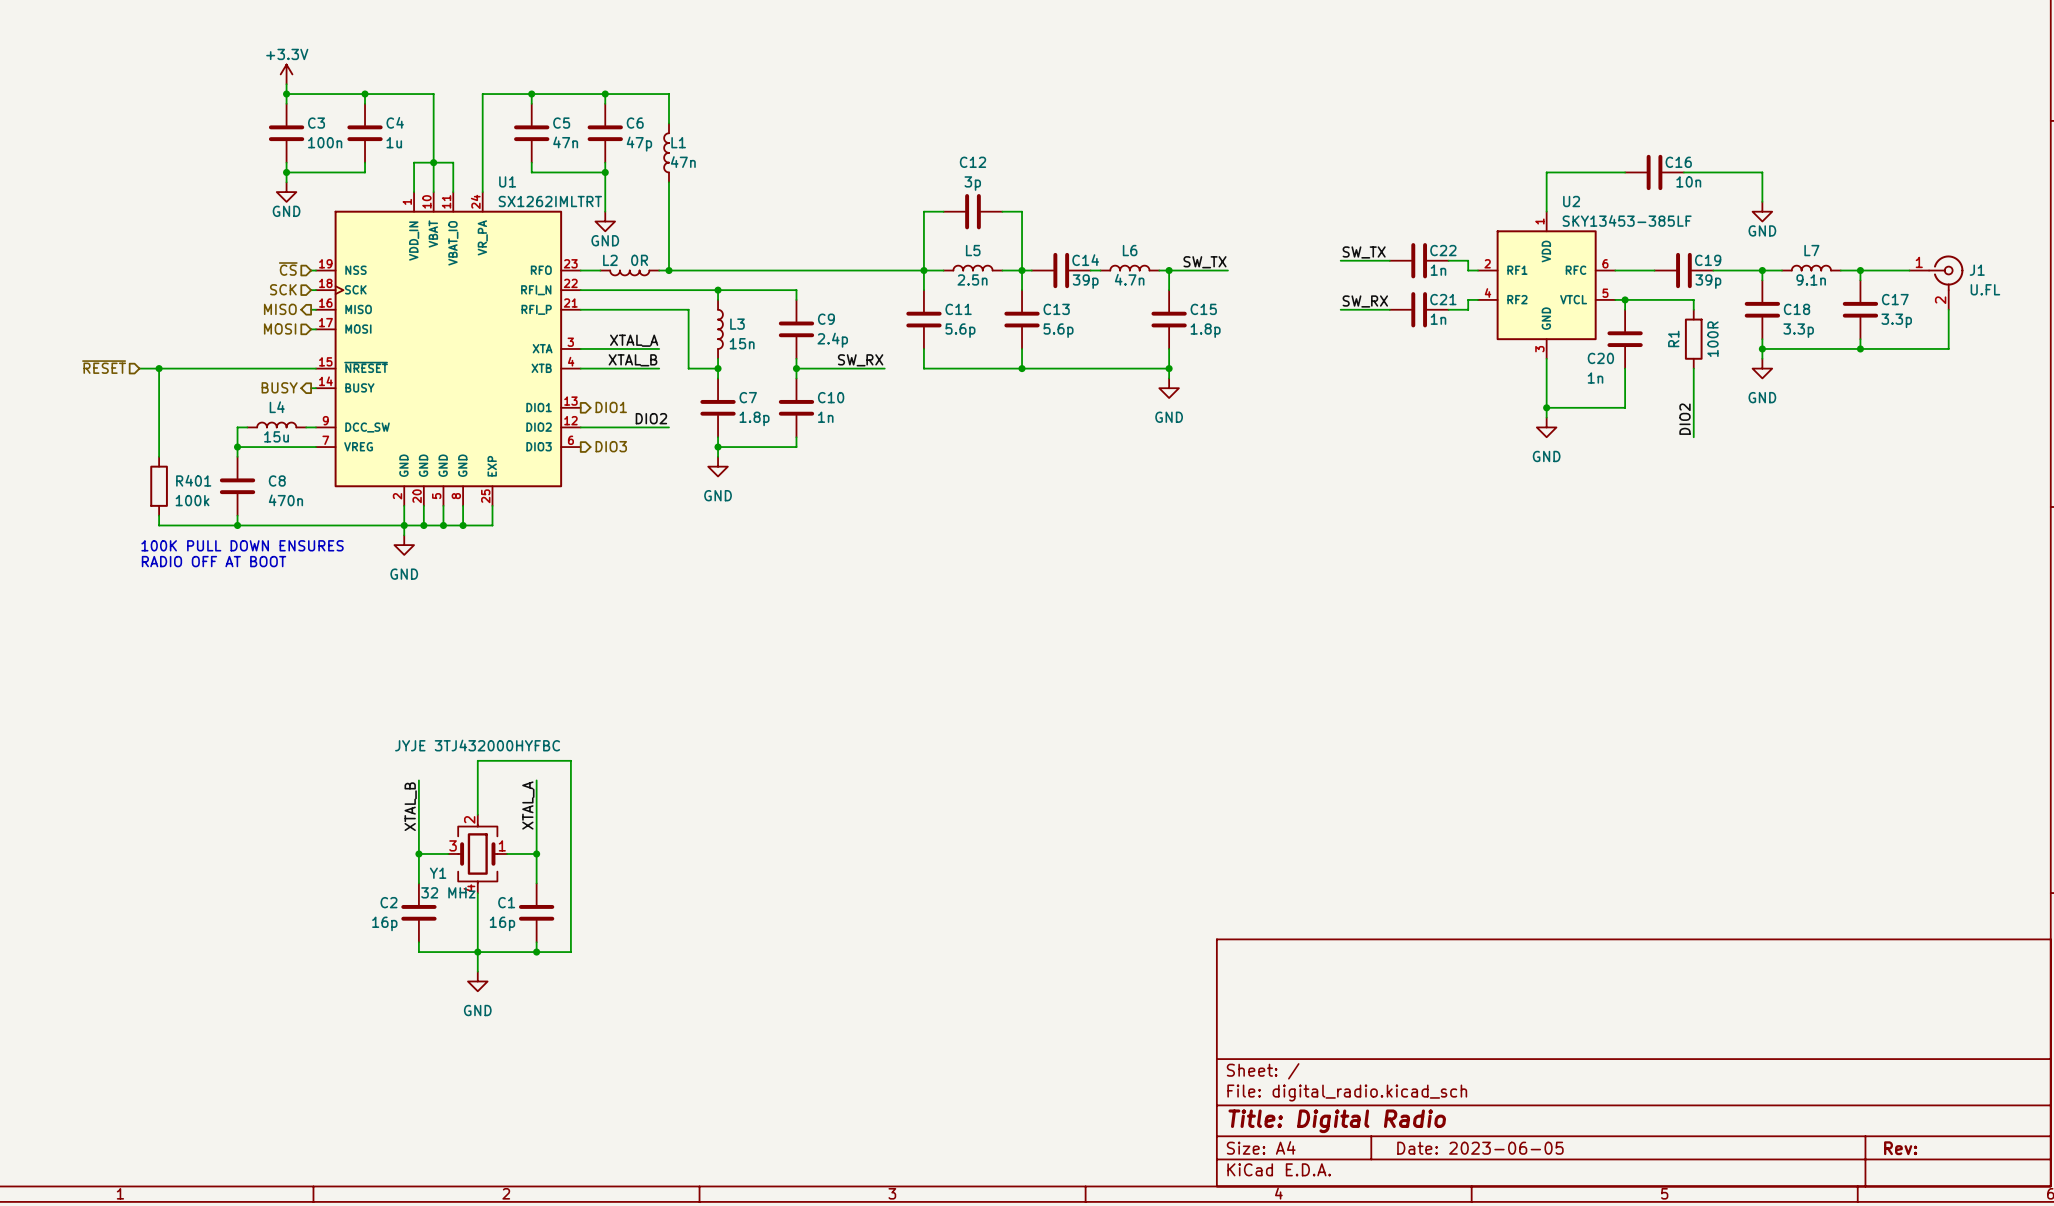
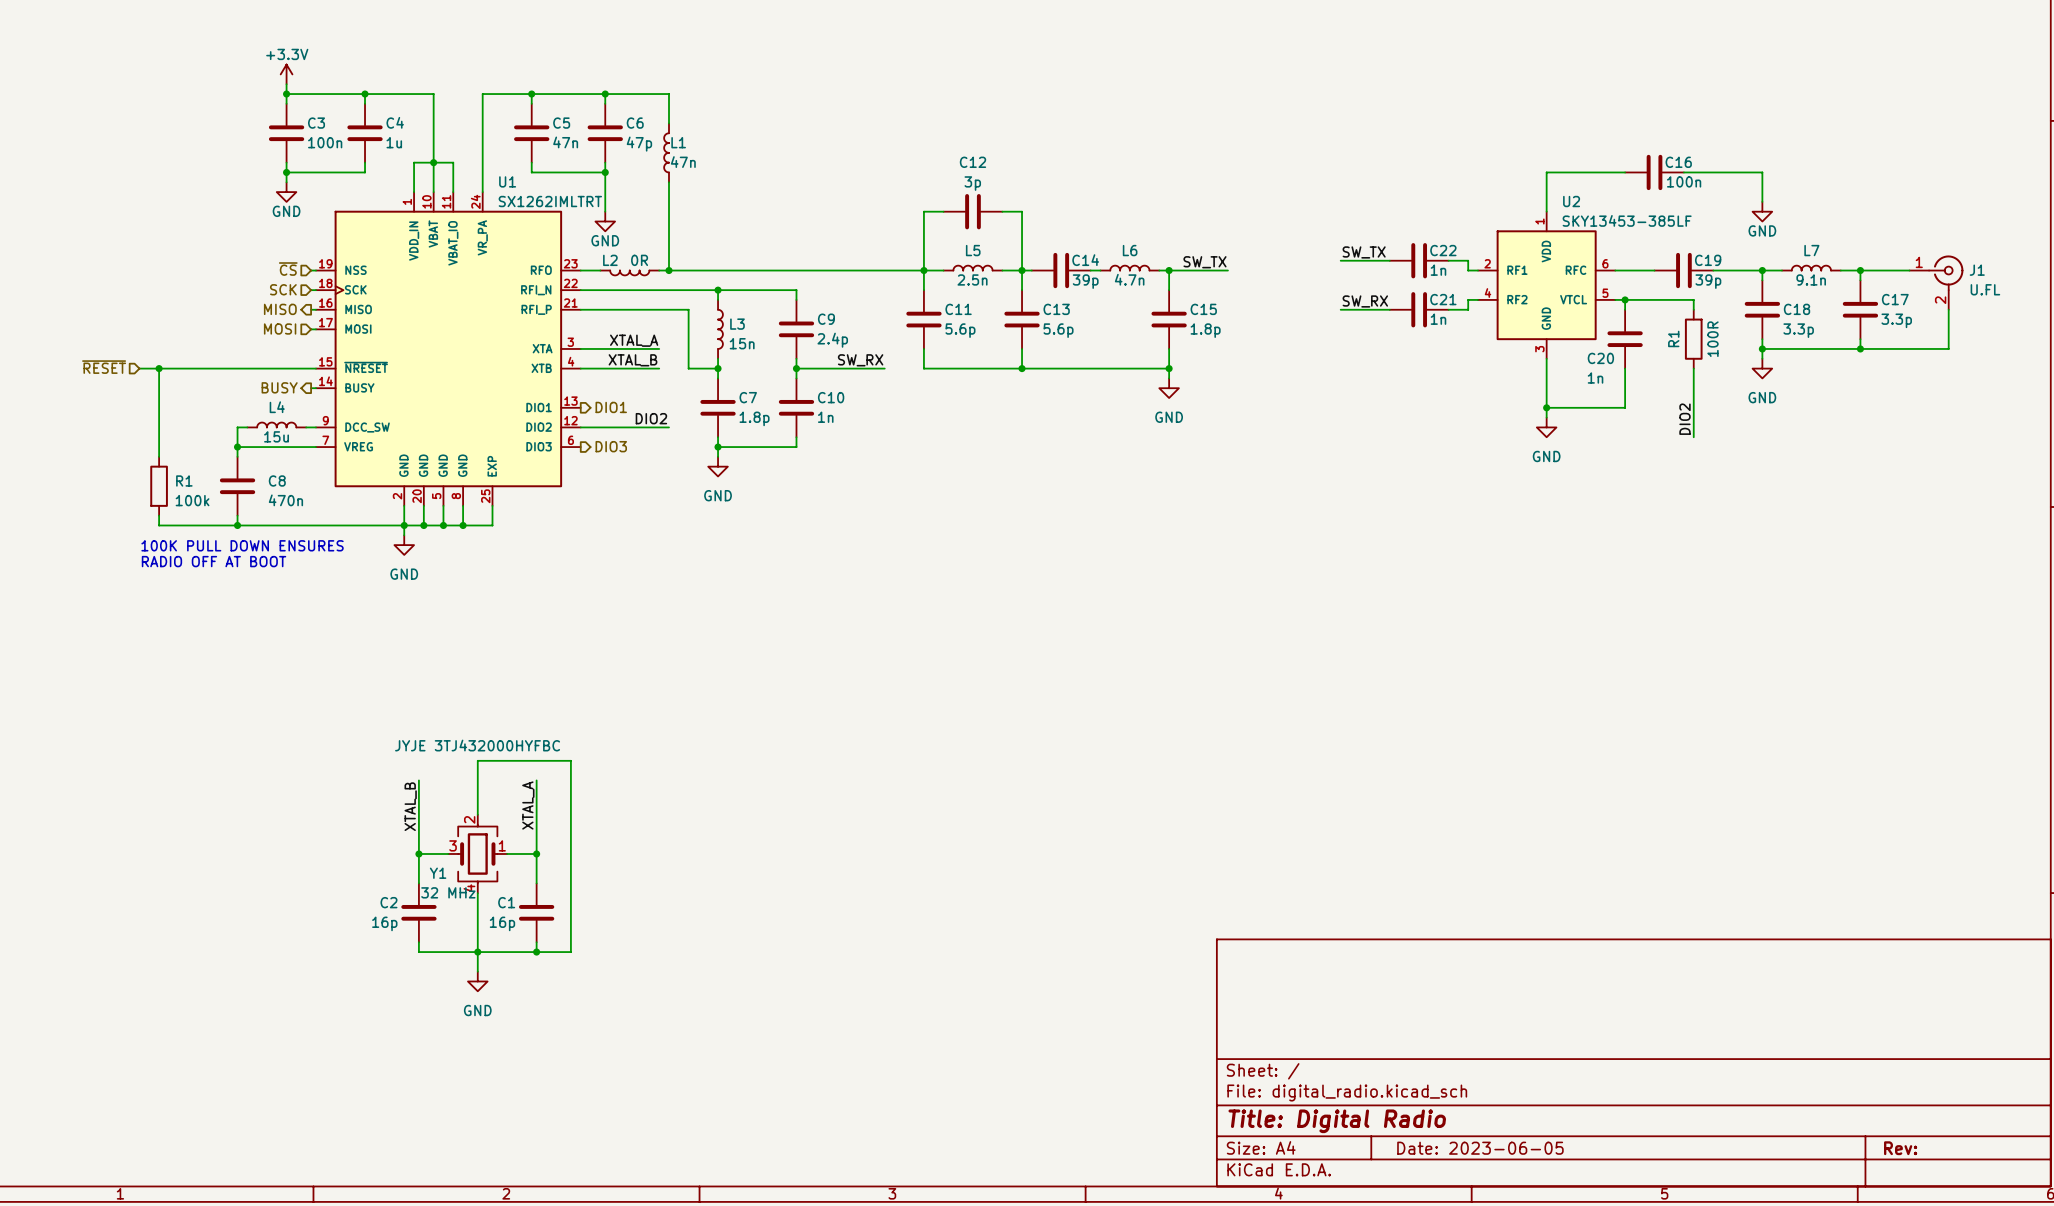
C16 value: 10n (1688, 181) -> 100n (1684, 181)
R401 name: R401 (193, 480) -> R1 (184, 480)

